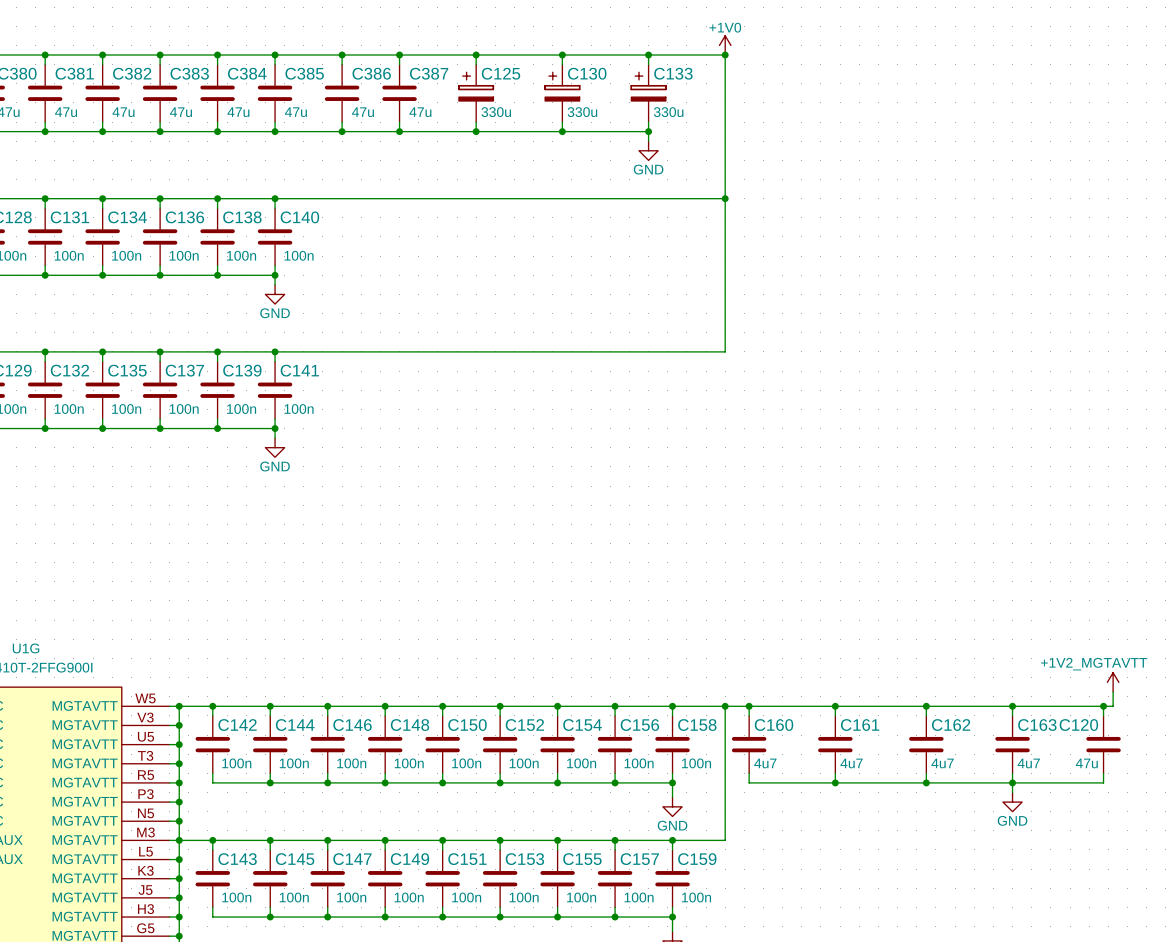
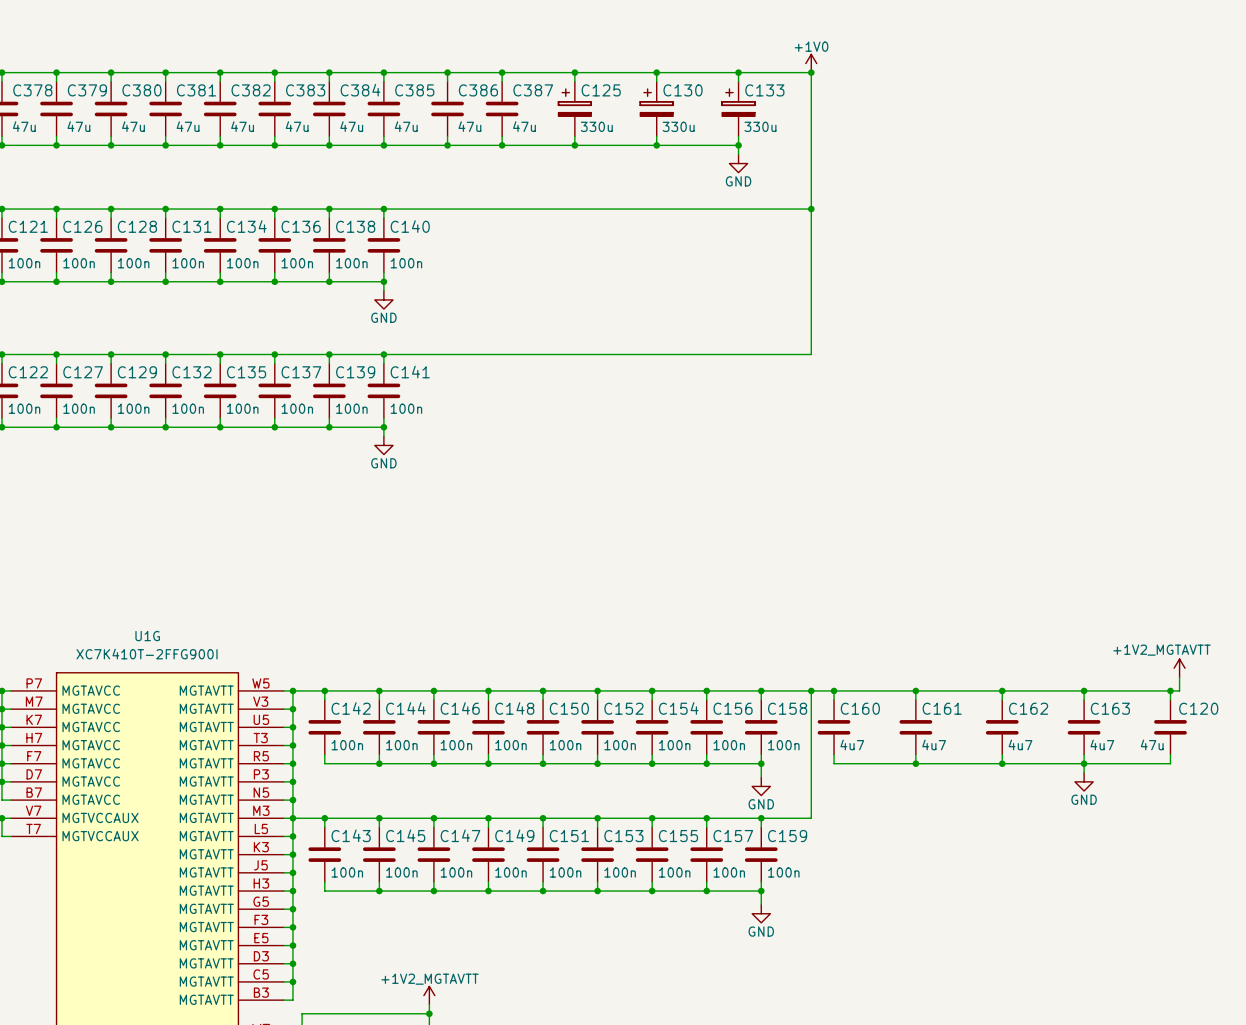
C120 name position: C120 (1078, 725) -> C120 (1198, 708)

